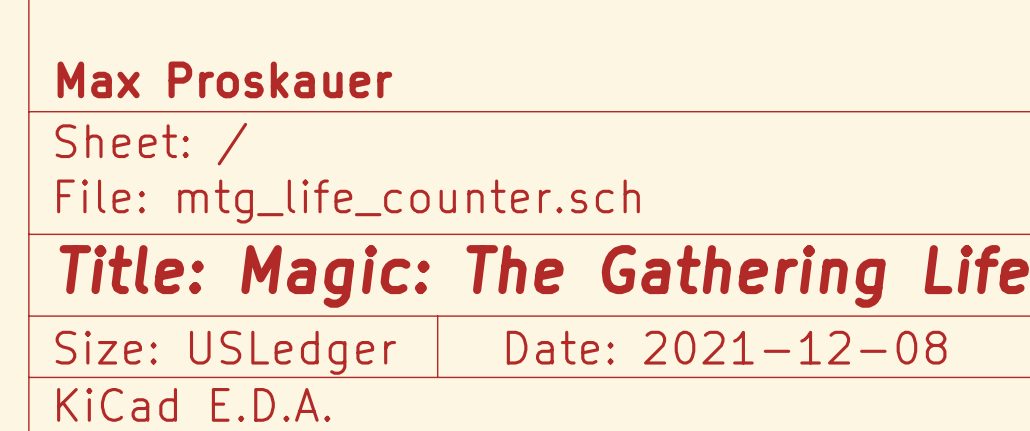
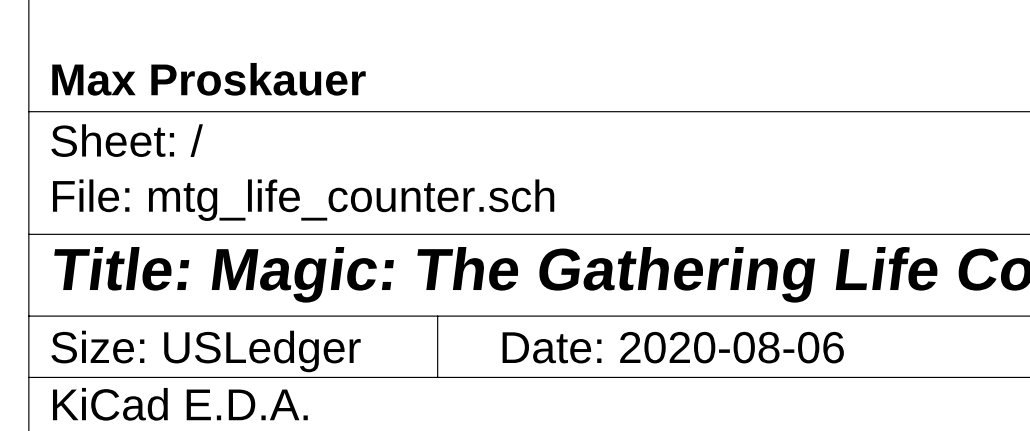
title block: Date: 2021-12-08 (726, 347) -> Date: 2020-08-06 (673, 347)

